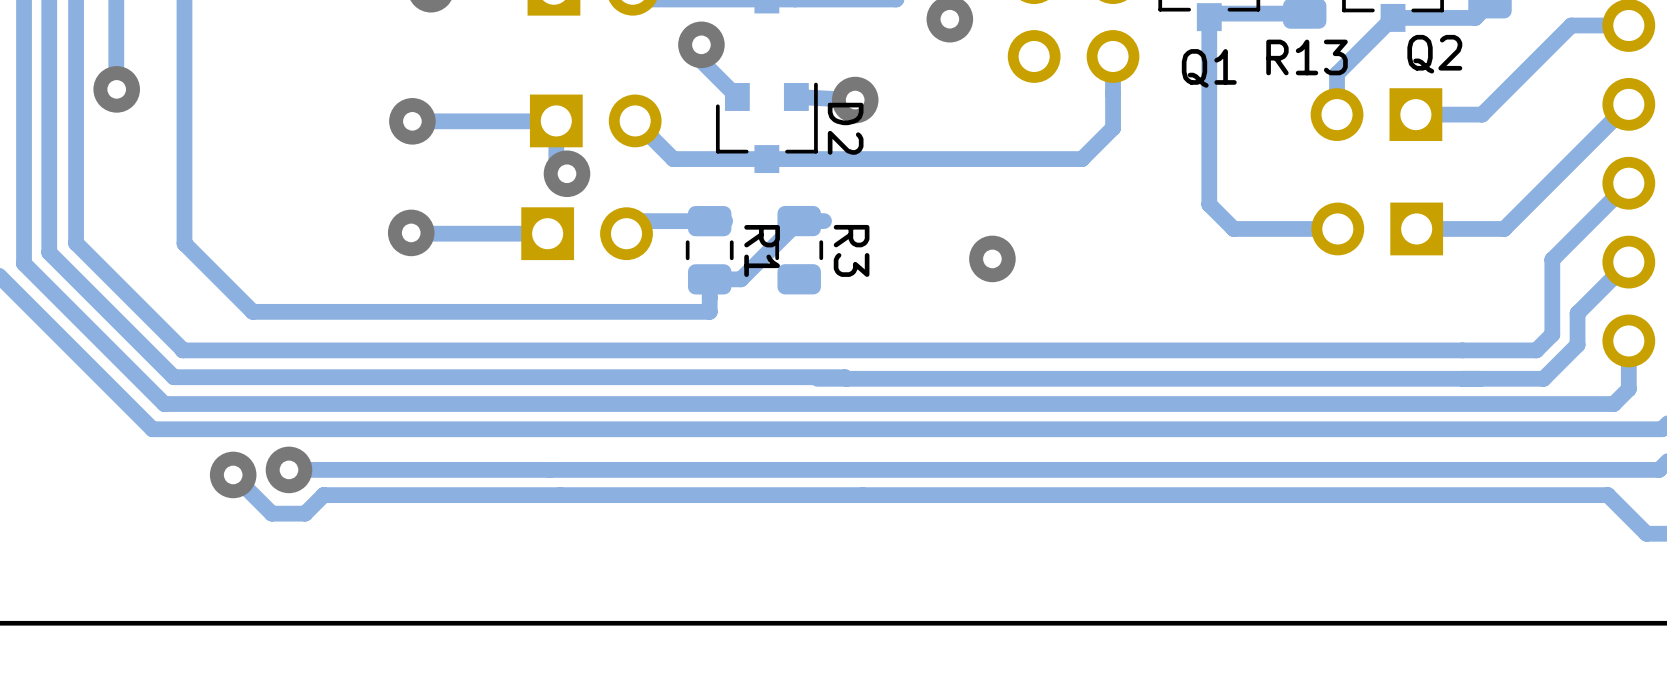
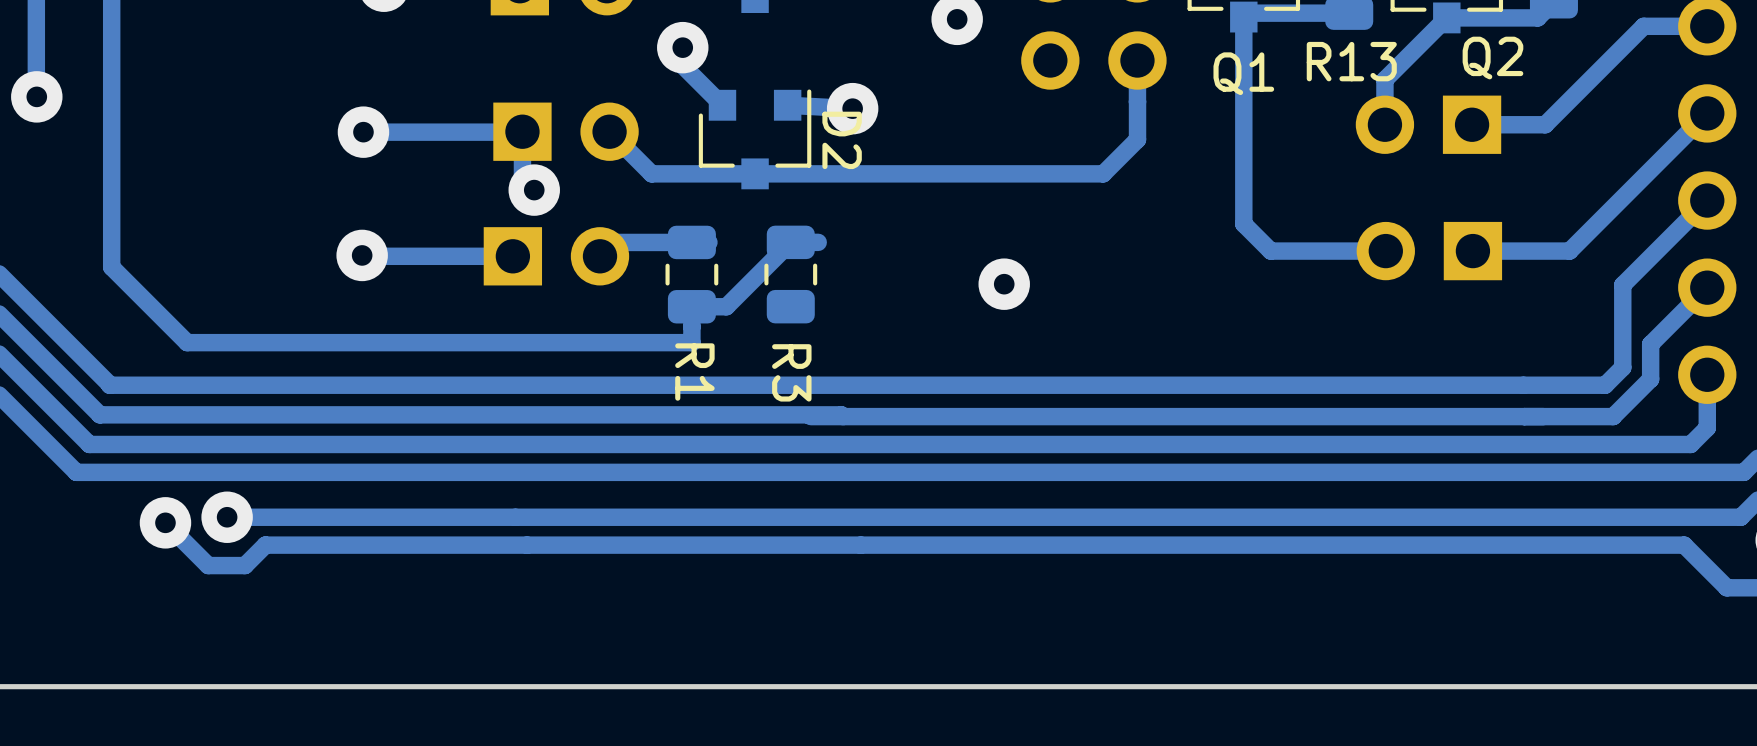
R1 name position: R1 (762, 250) -> R1 (694, 372)
R3 name position: R3 (851, 250) -> R3 (791, 372)

